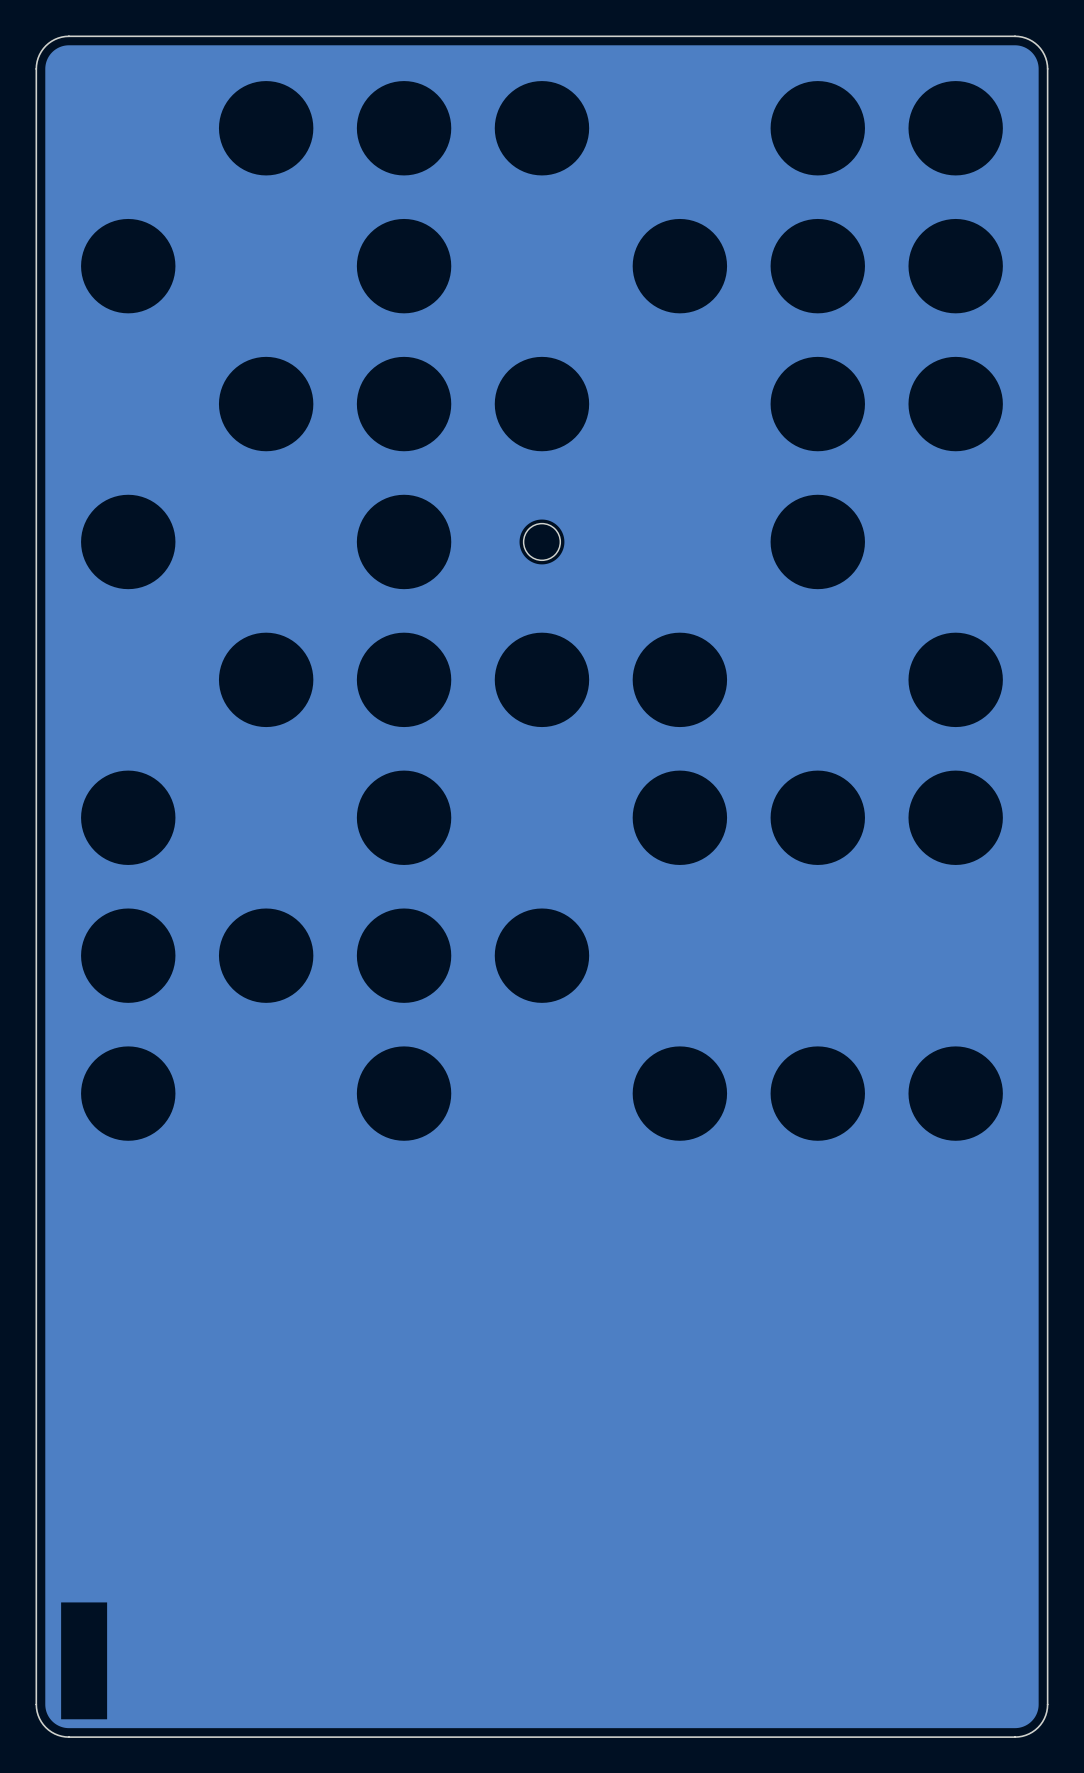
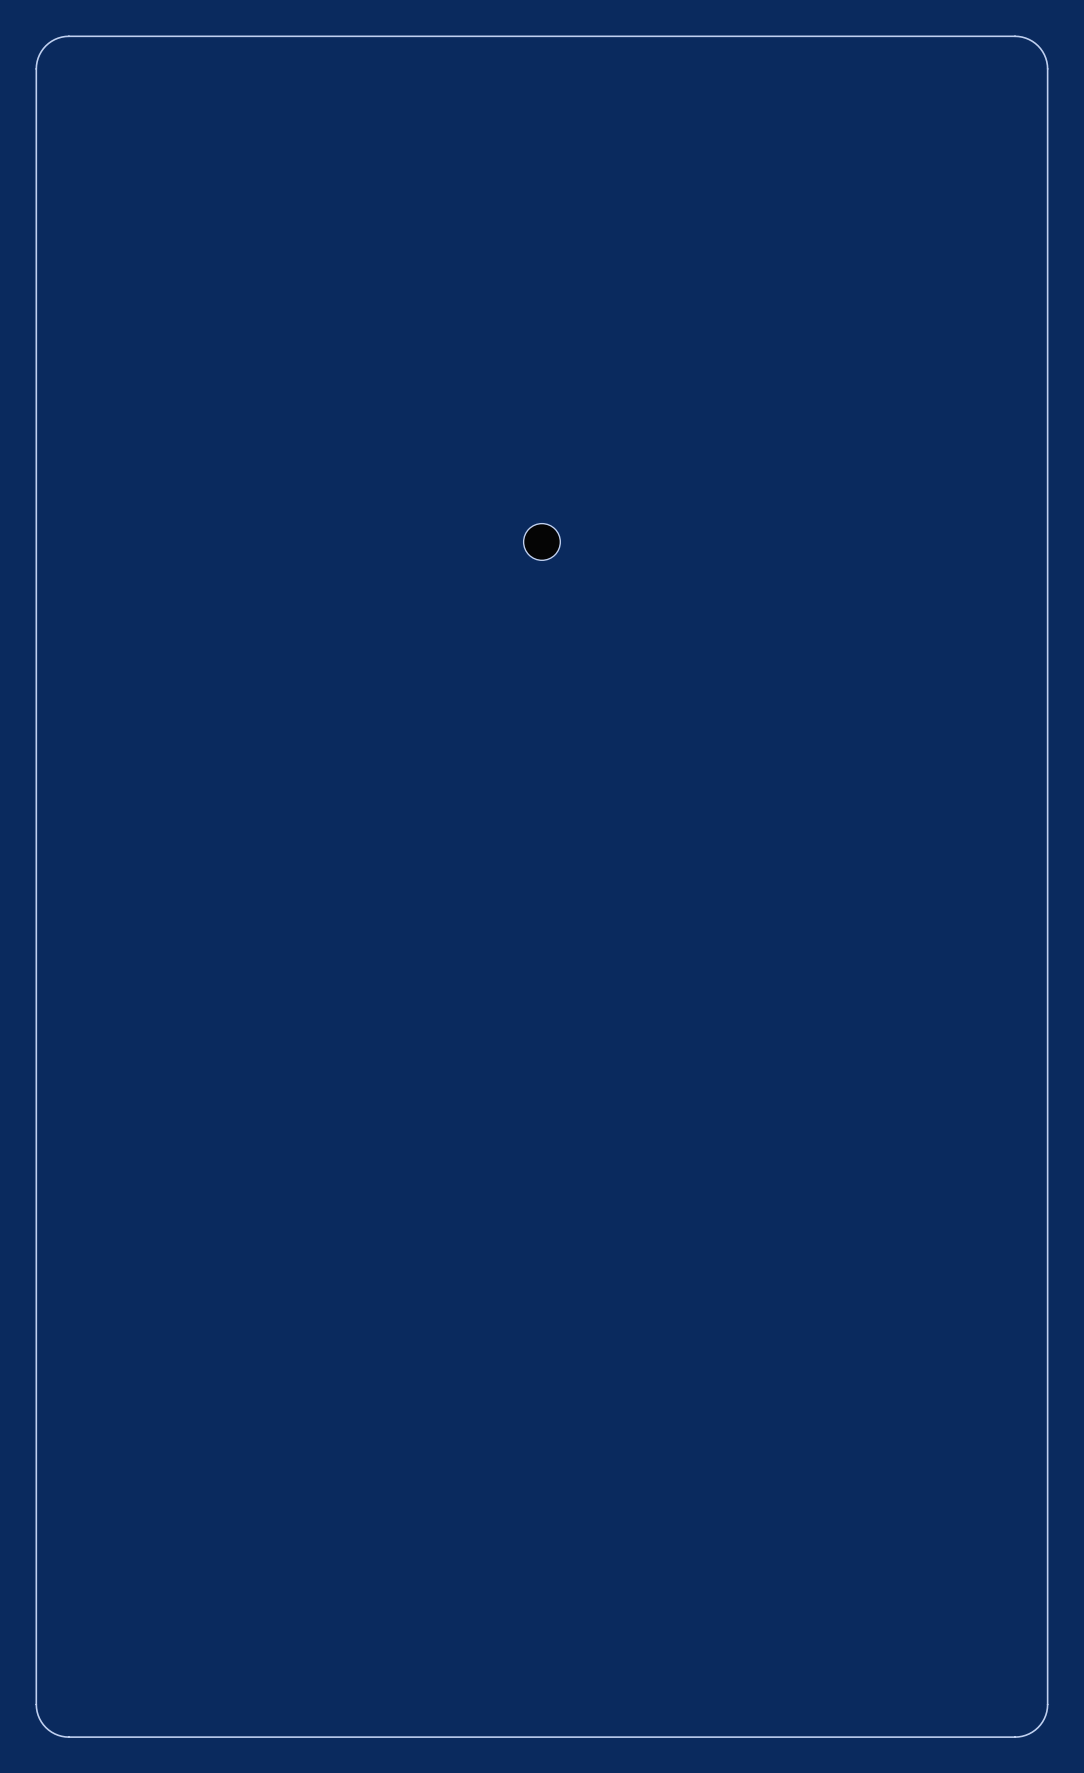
drawing: [45, 45, 1039, 1729] -> none

